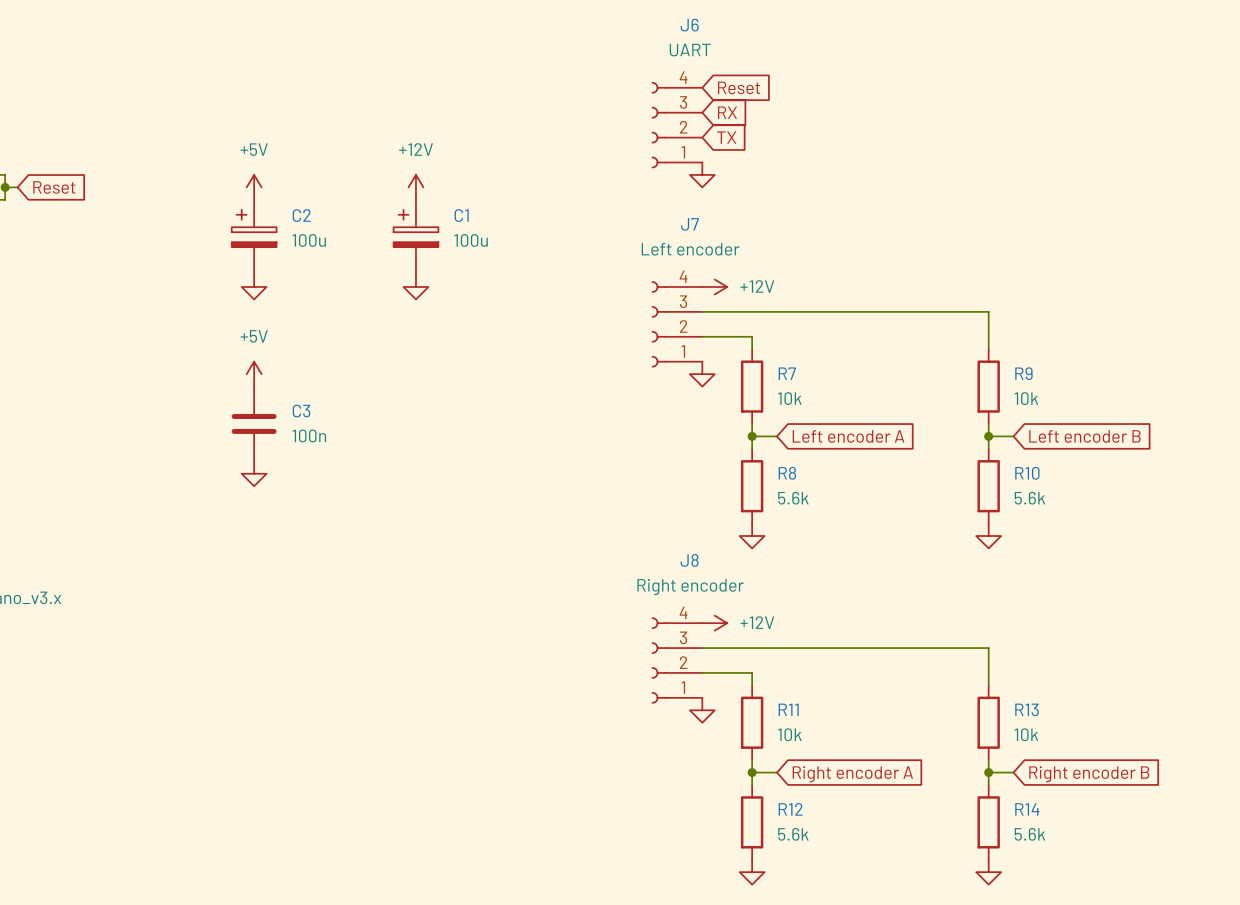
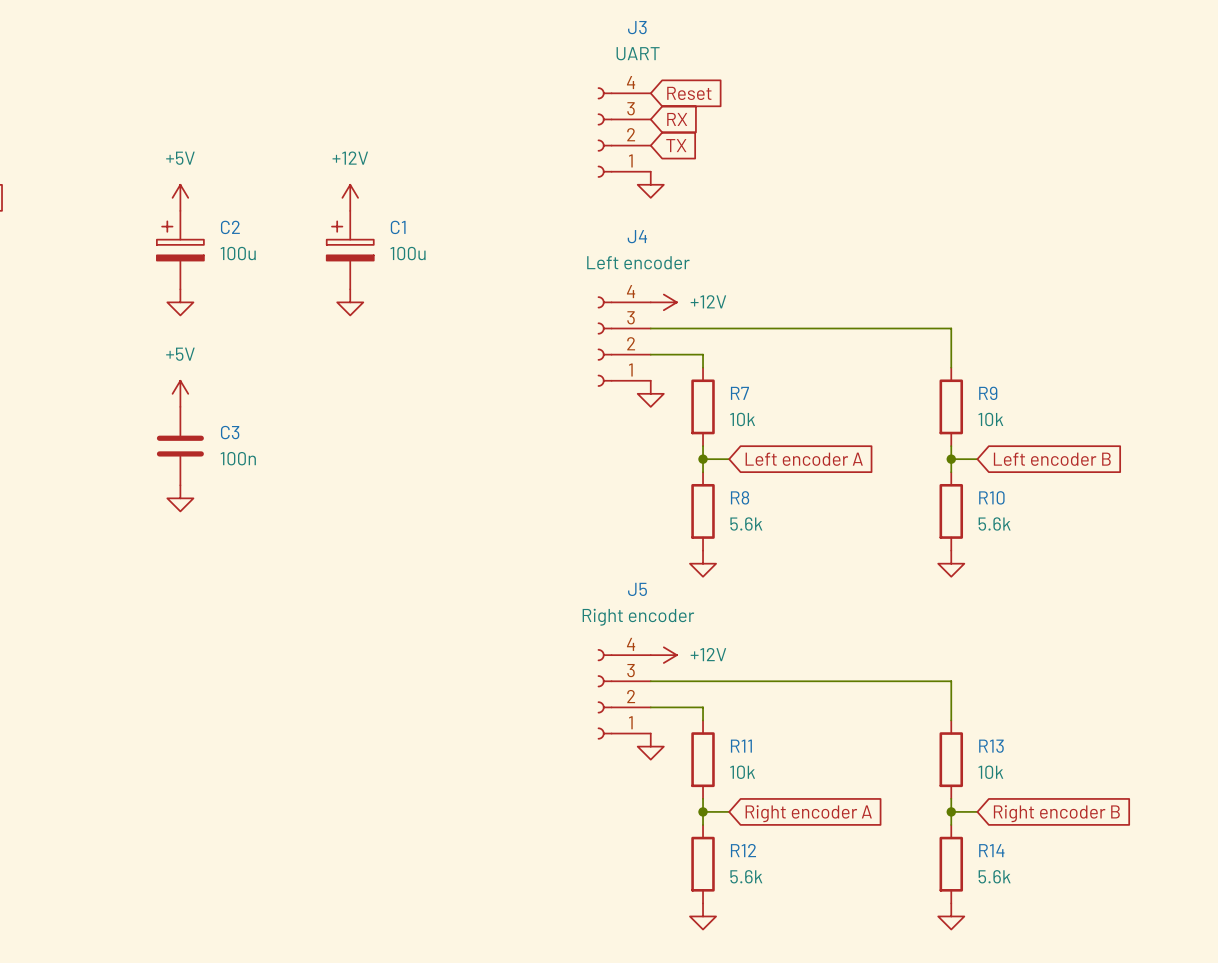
J6 name: J6 (689, 25) -> J3 (637, 27)
J7 name: J7 (689, 224) -> J4 (637, 236)
J8 name: J8 (689, 560) -> J5 (637, 589)

